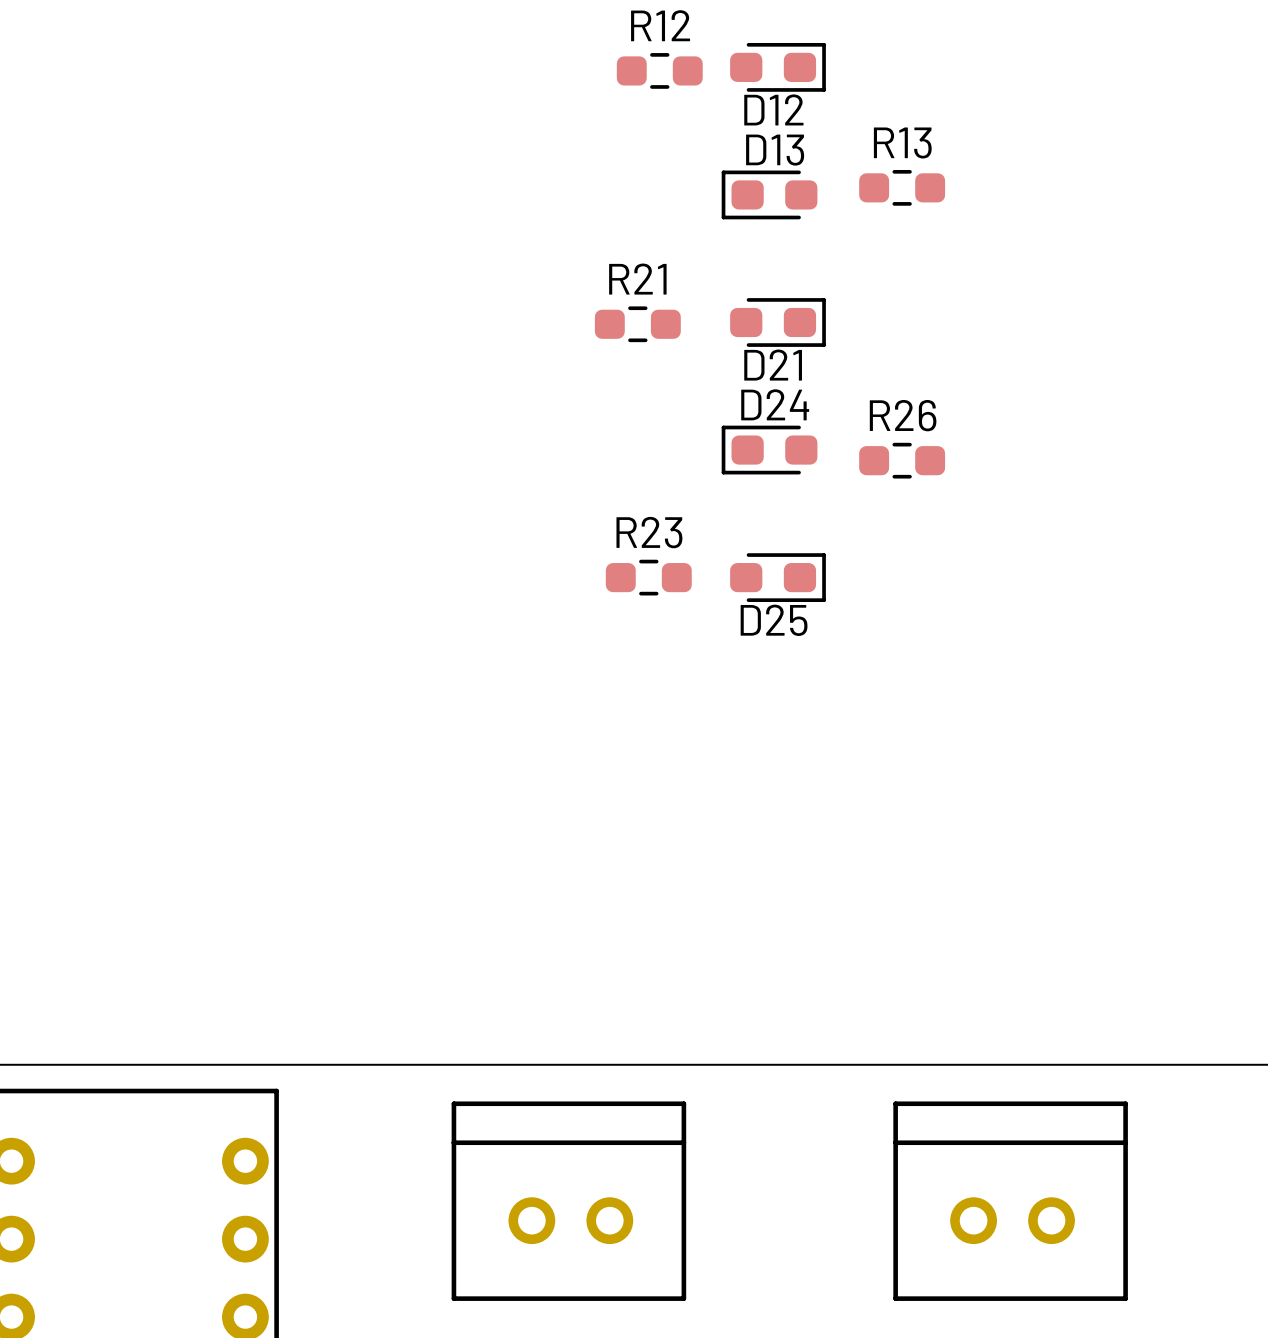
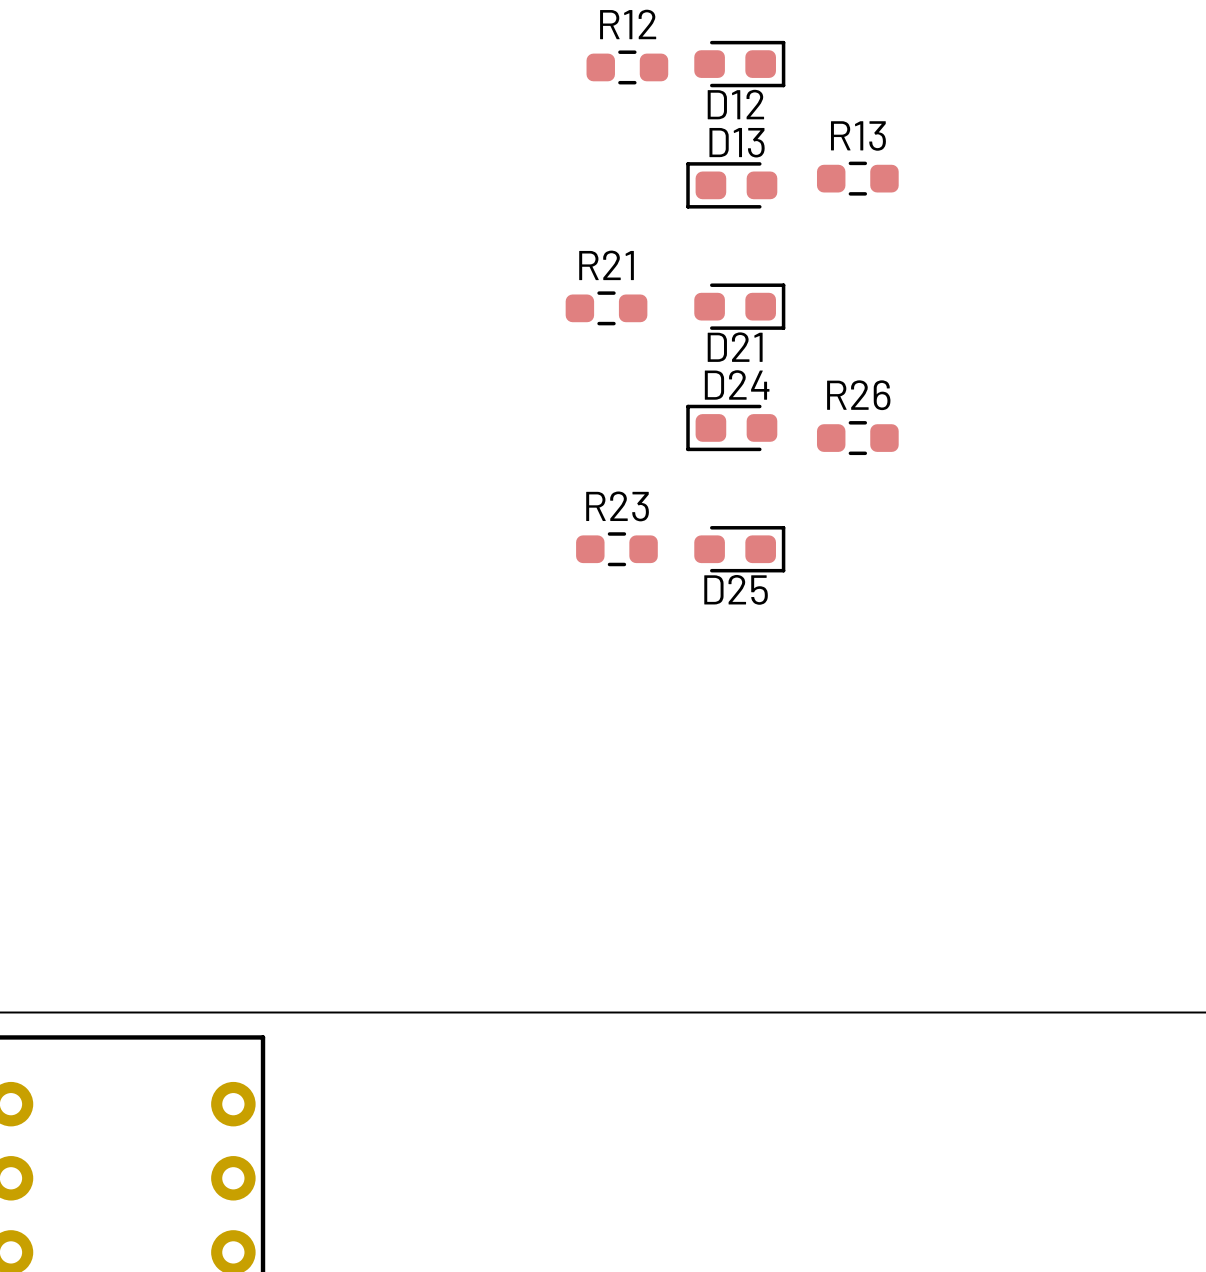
part: (568, 1201) -> none
part: (1010, 1201) -> none

